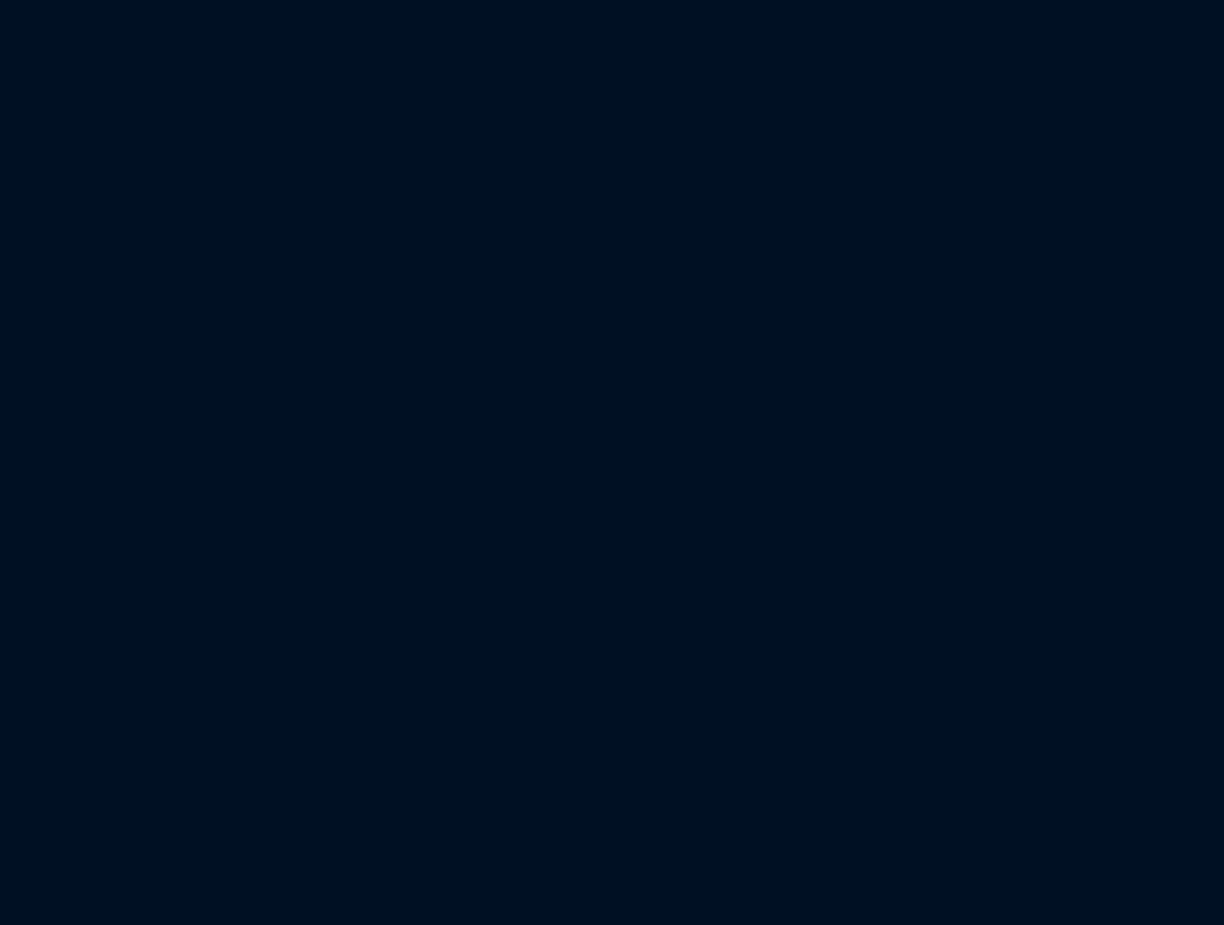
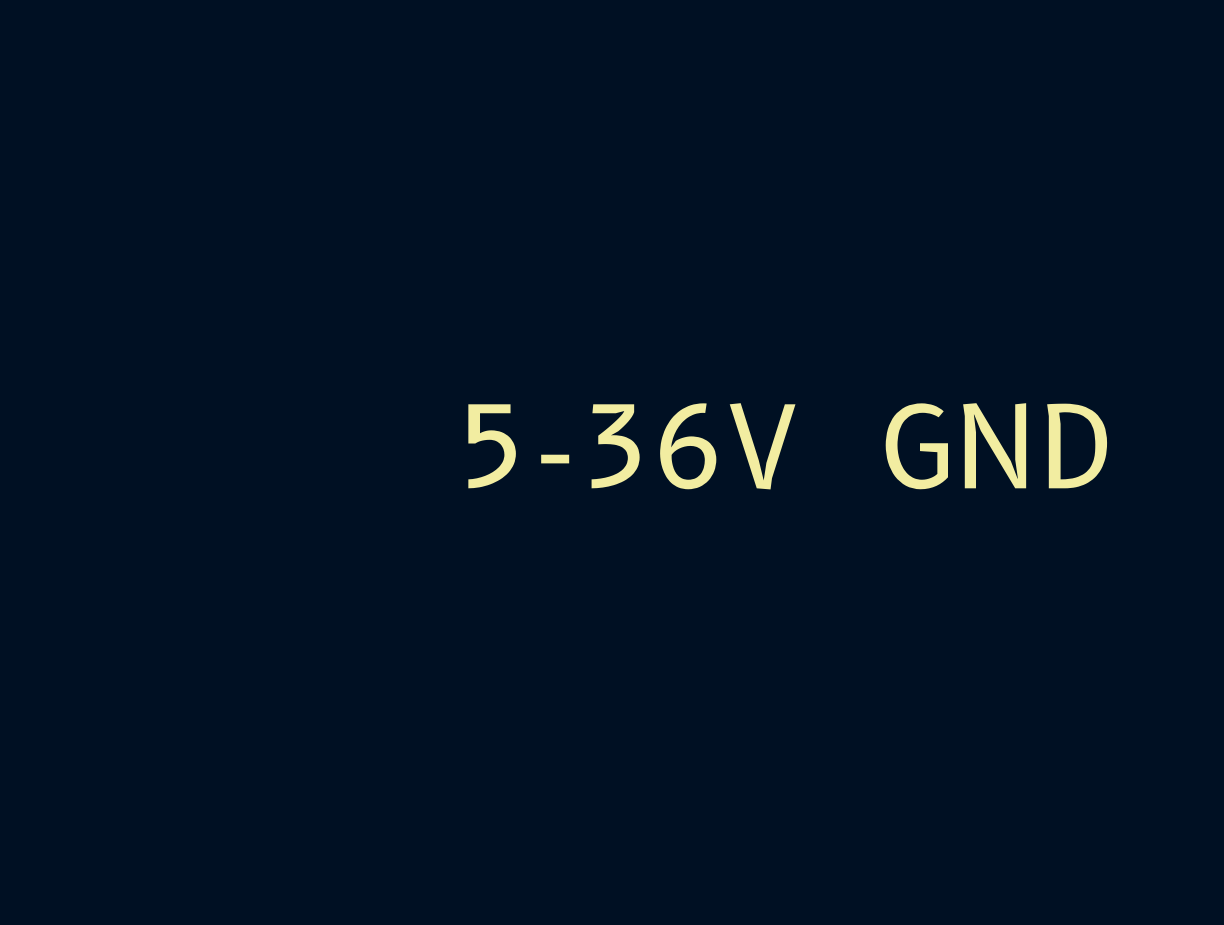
text: none -> 5-36V (631, 446)
text: none -> GND (996, 446)

